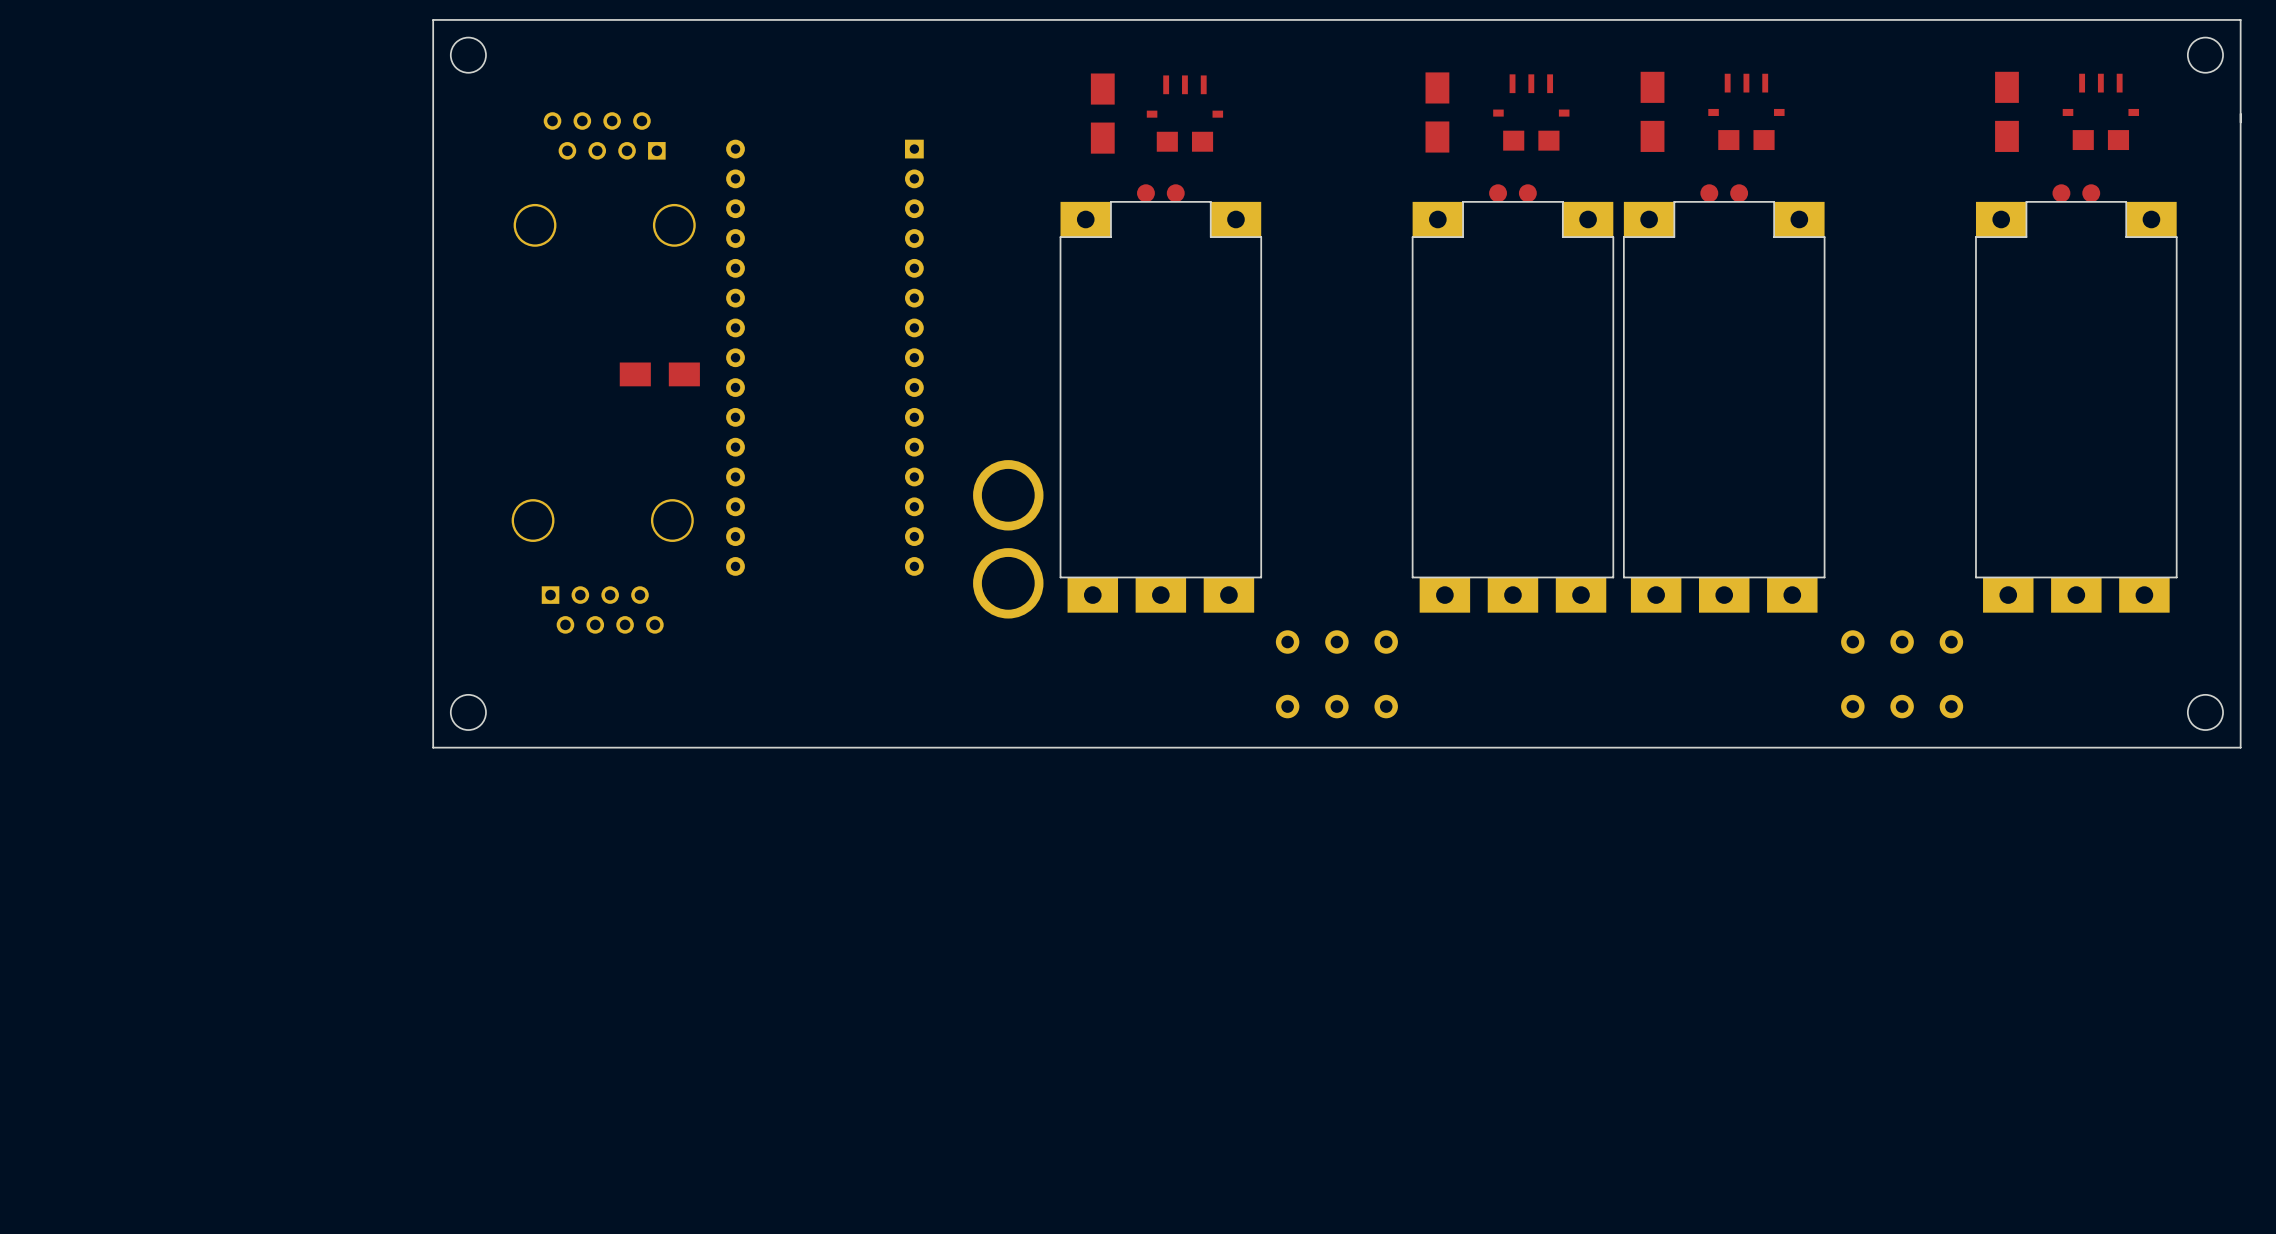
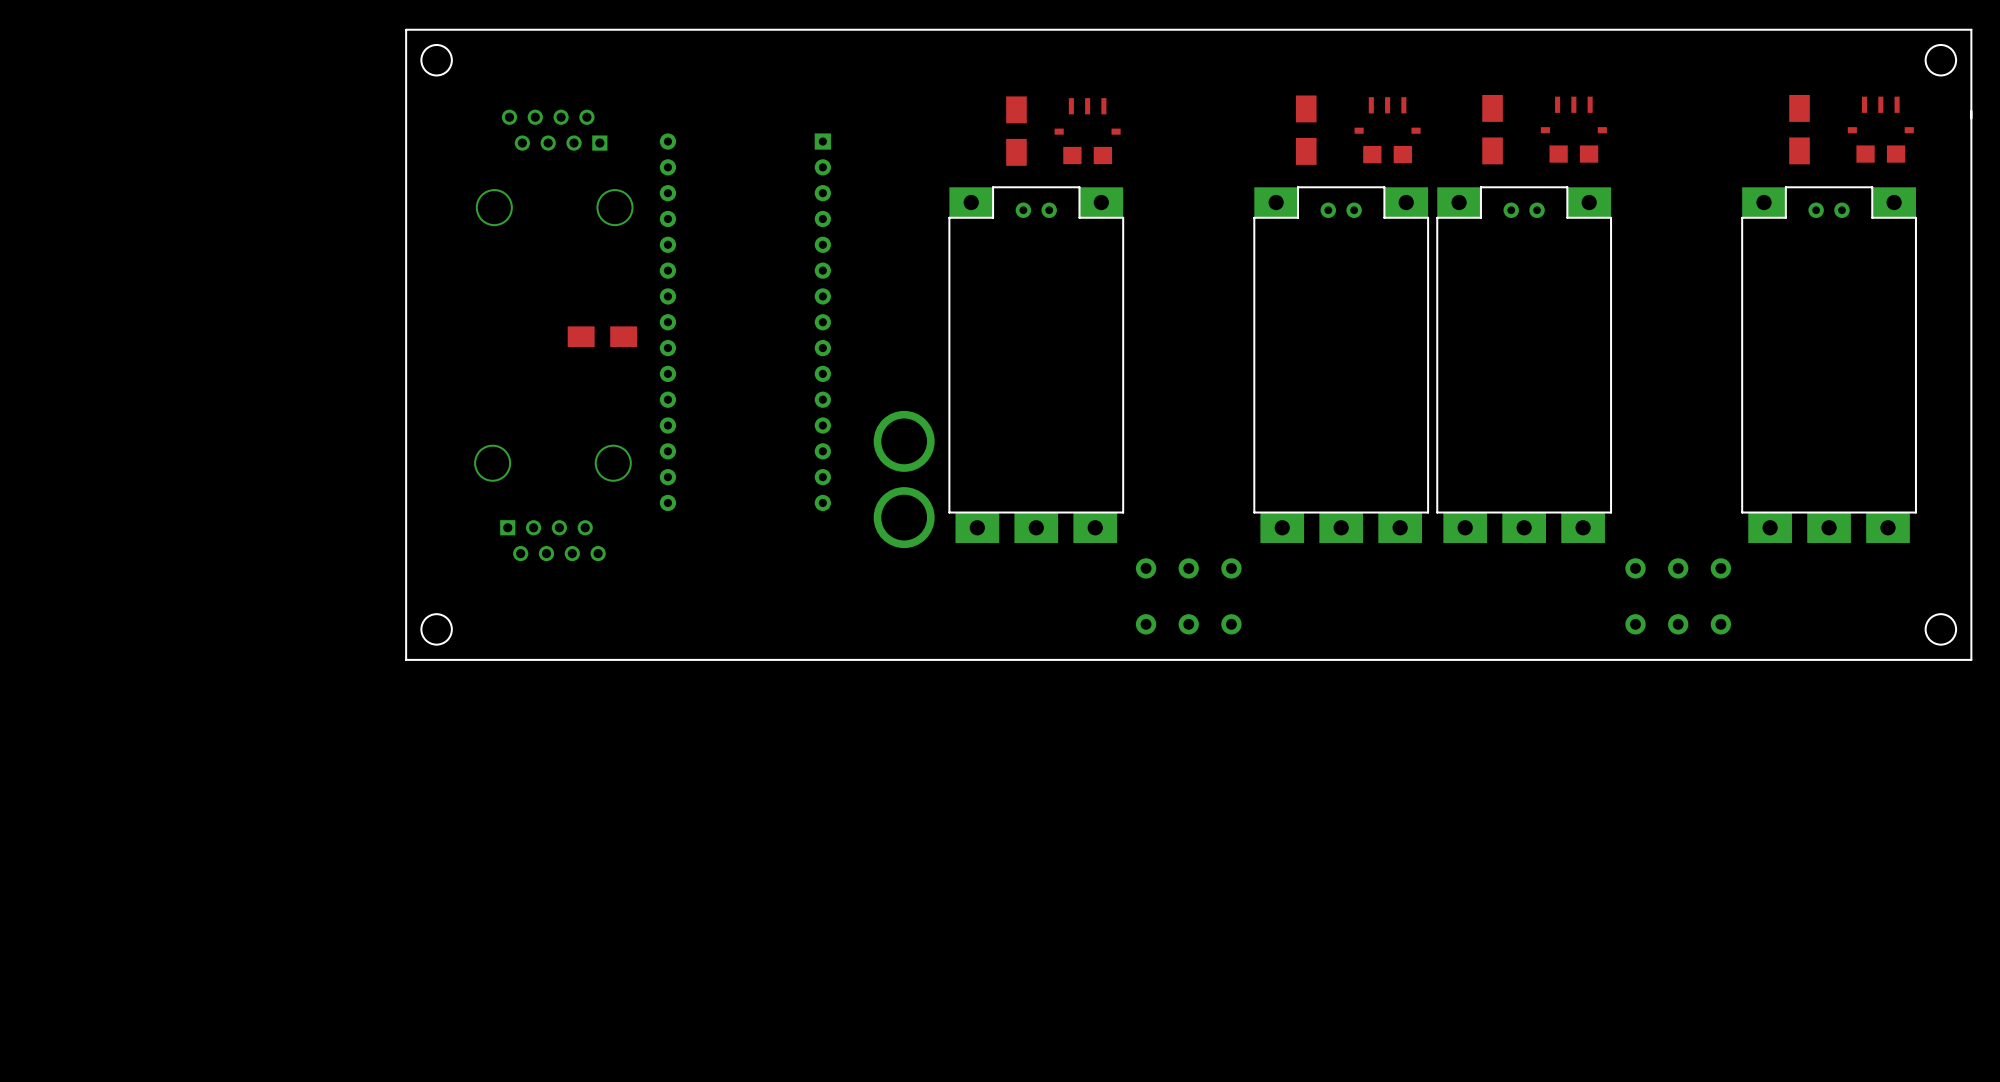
part position: (1652, 111) -> (1492, 129)
part position: (1746, 111) -> (1573, 129)
part position: (2006, 111) -> (1799, 129)
part position: (2100, 111) -> (1880, 129)
part position: (1437, 112) -> (1306, 130)
part position: (1531, 112) -> (1387, 130)
part position: (1102, 113) -> (1016, 131)
part position: (1184, 113) -> (1087, 131)
part footprint: [1059, 184, 1263, 613] -> [948, 186, 1124, 544]
part footprint: [1411, 184, 1615, 613] -> [1253, 186, 1429, 544]
part footprint: [1622, 184, 1826, 613] -> [1436, 186, 1612, 544]
part footprint: [1975, 184, 2178, 613] -> [1741, 186, 1917, 544]

